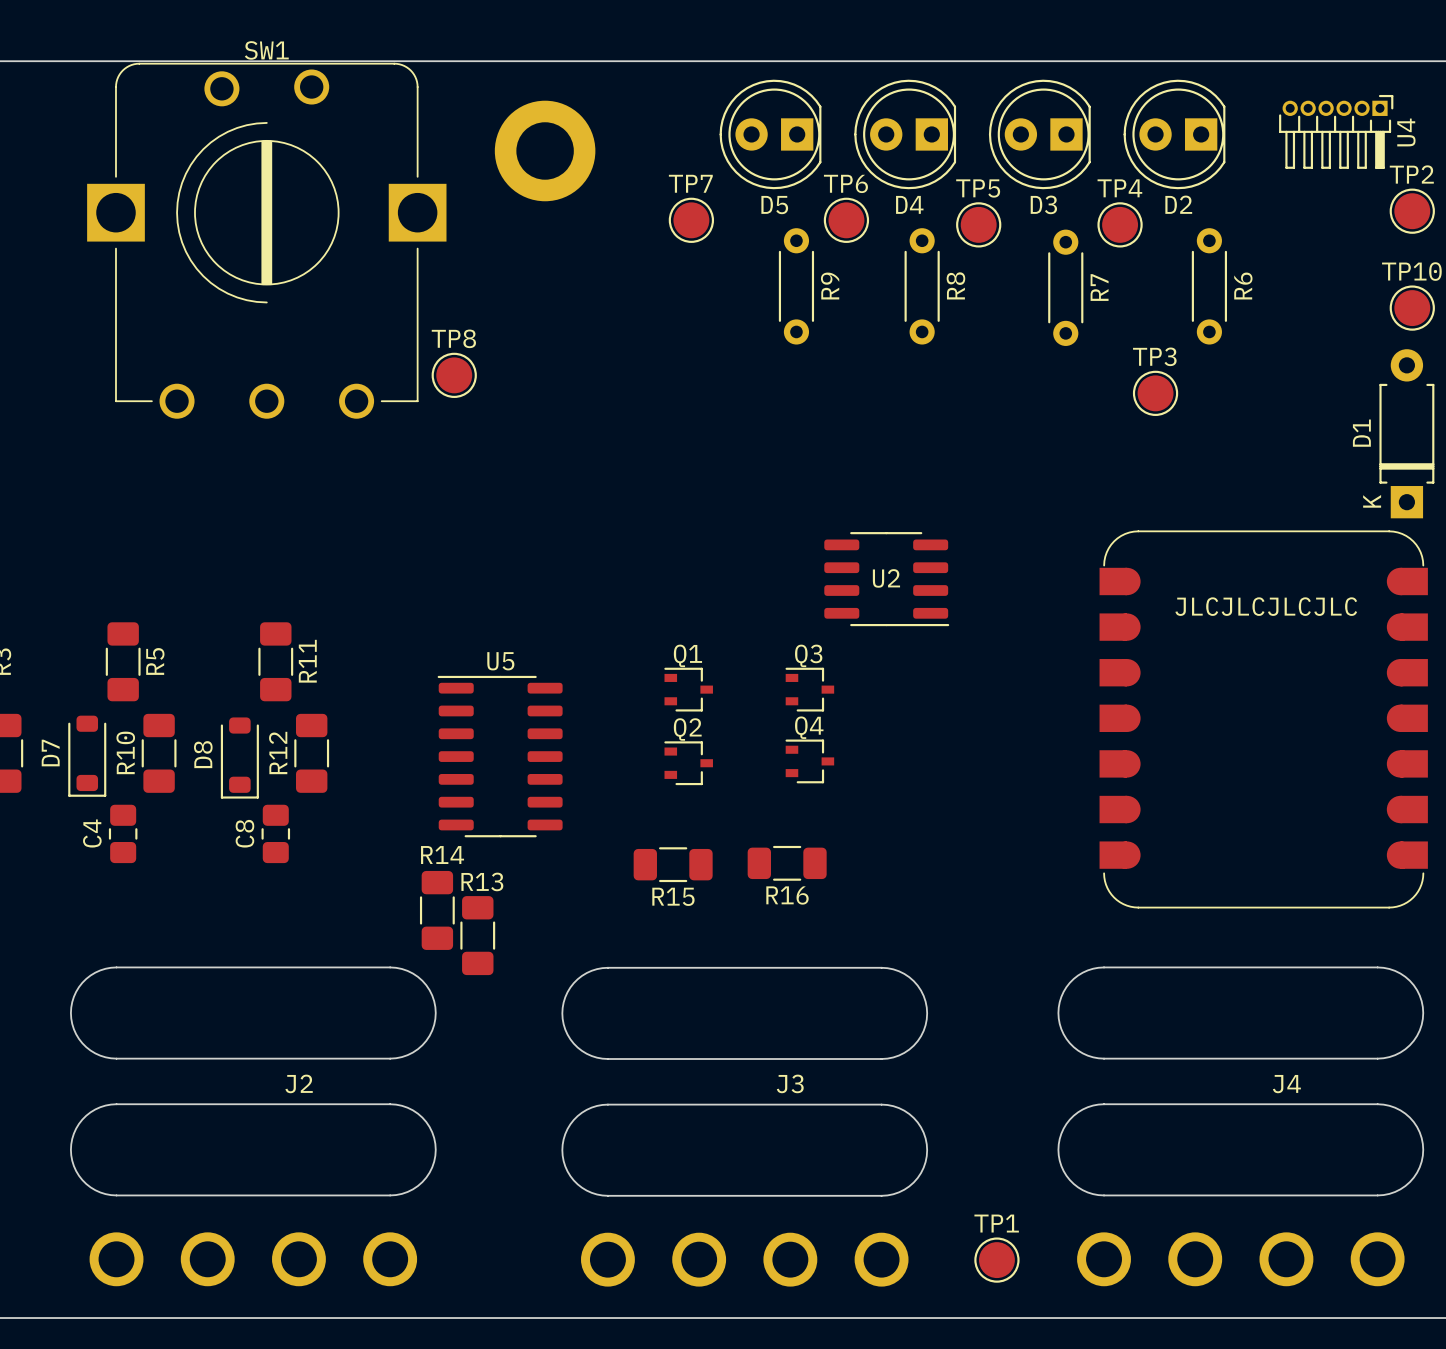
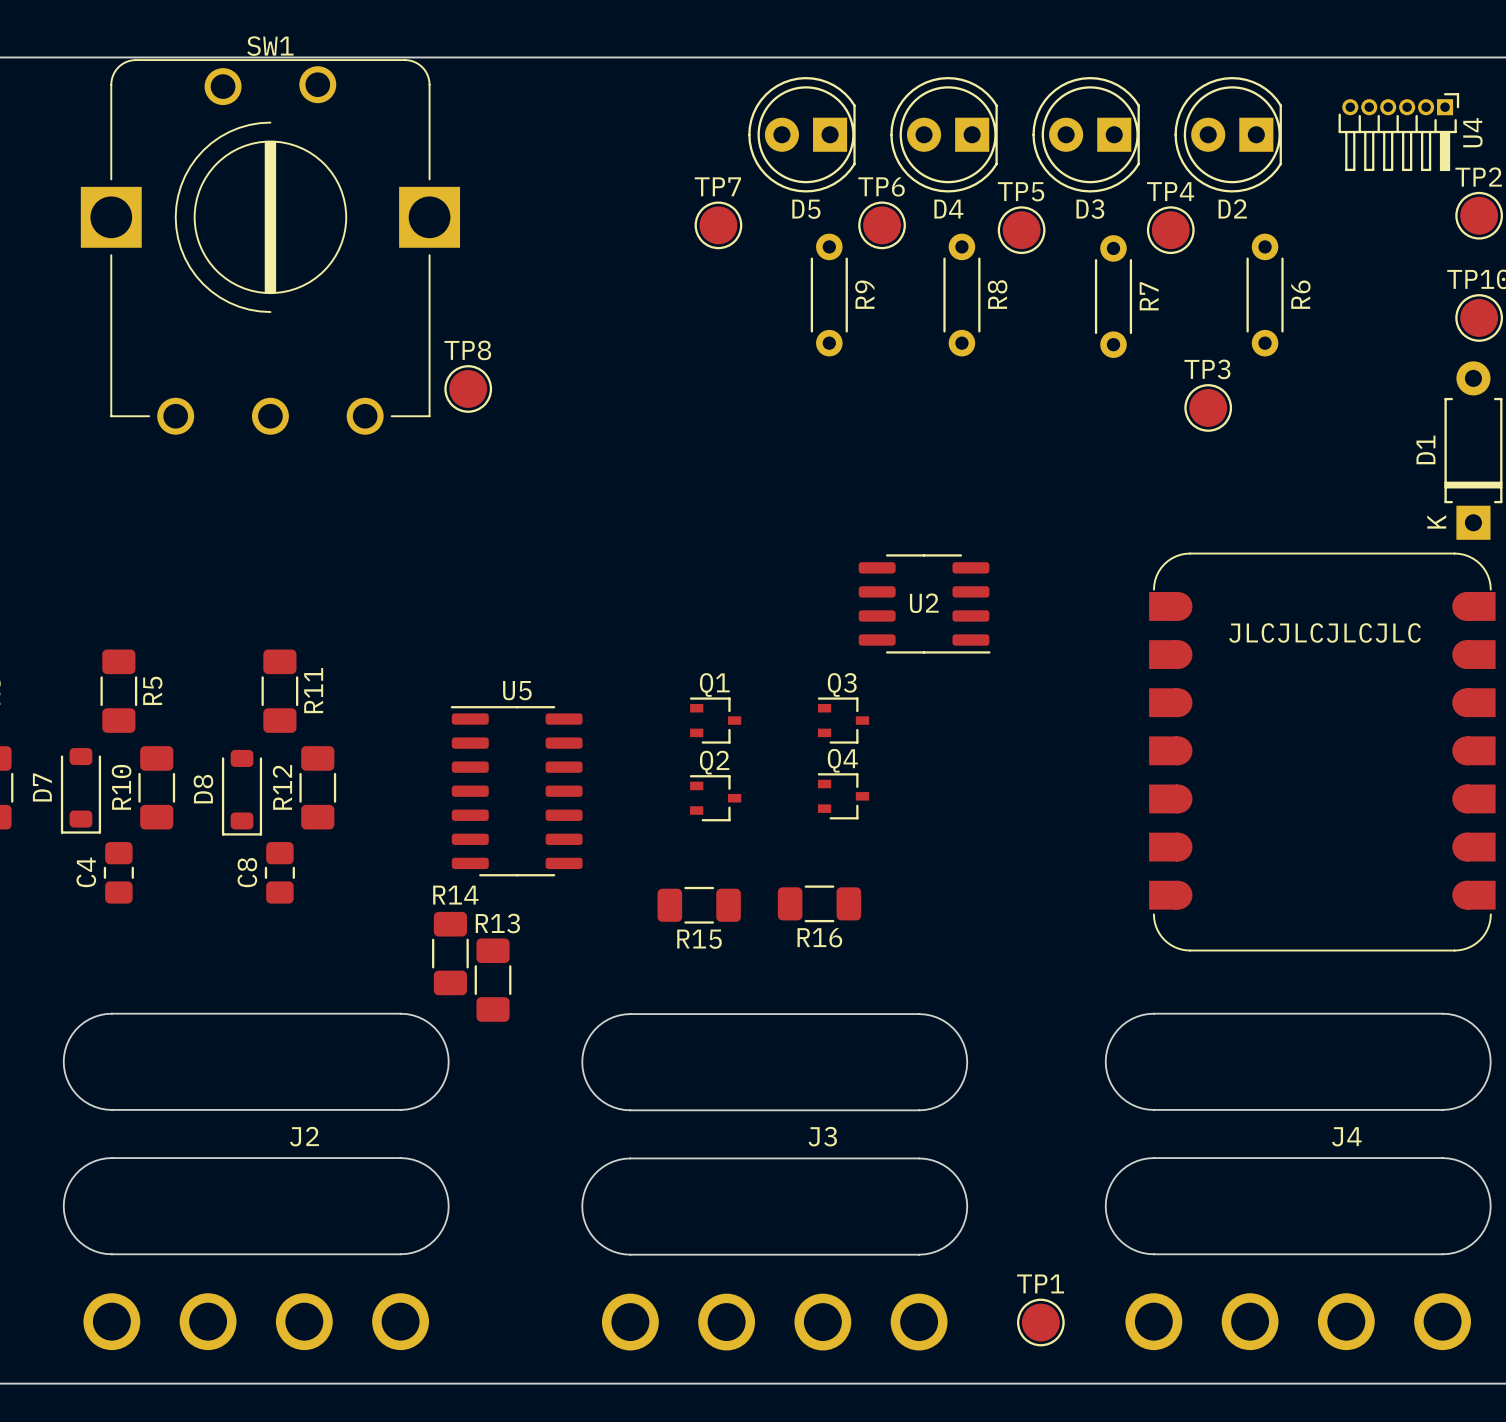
part: (545, 150) -> none

